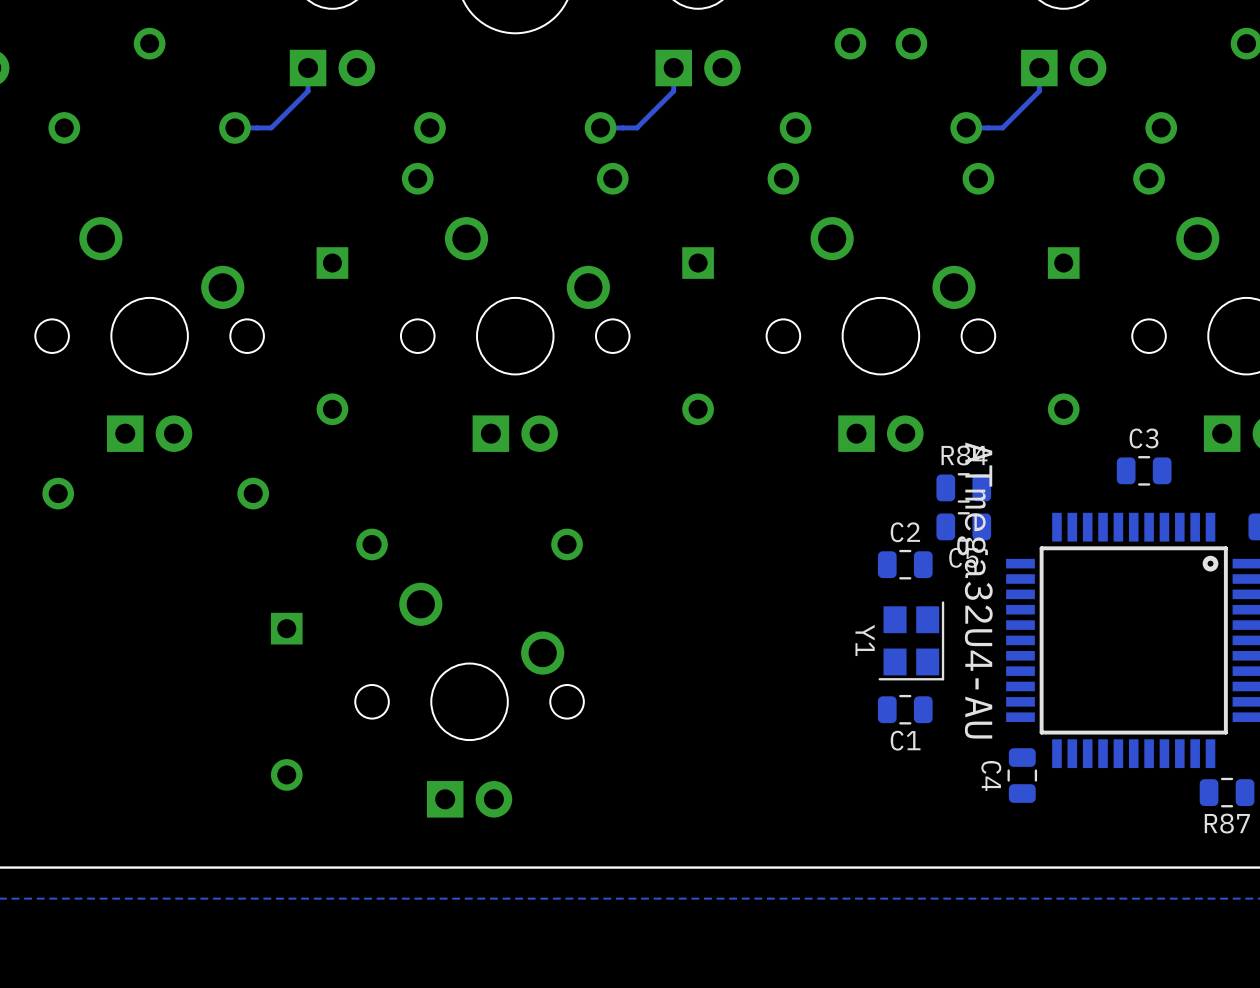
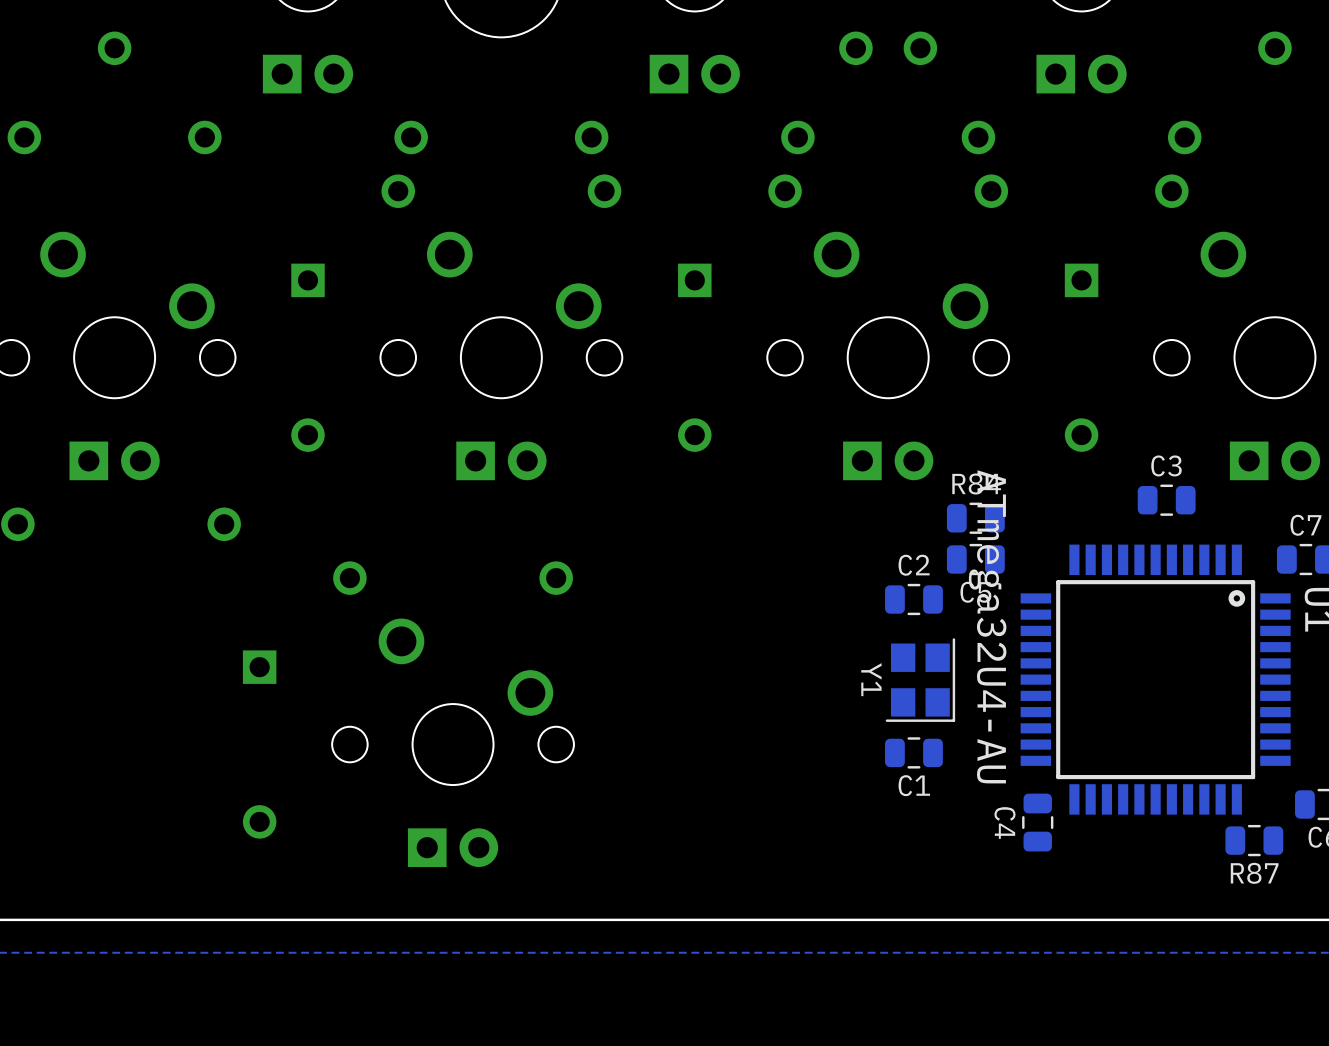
track: (308, 68) (308, 91) (271, 127) (234, 127) -> none
track: (673, 68) (673, 91) (636, 127) (600, 127) -> none
track: (1039, 68) (1039, 91) (1002, 127) (966, 127) -> none

